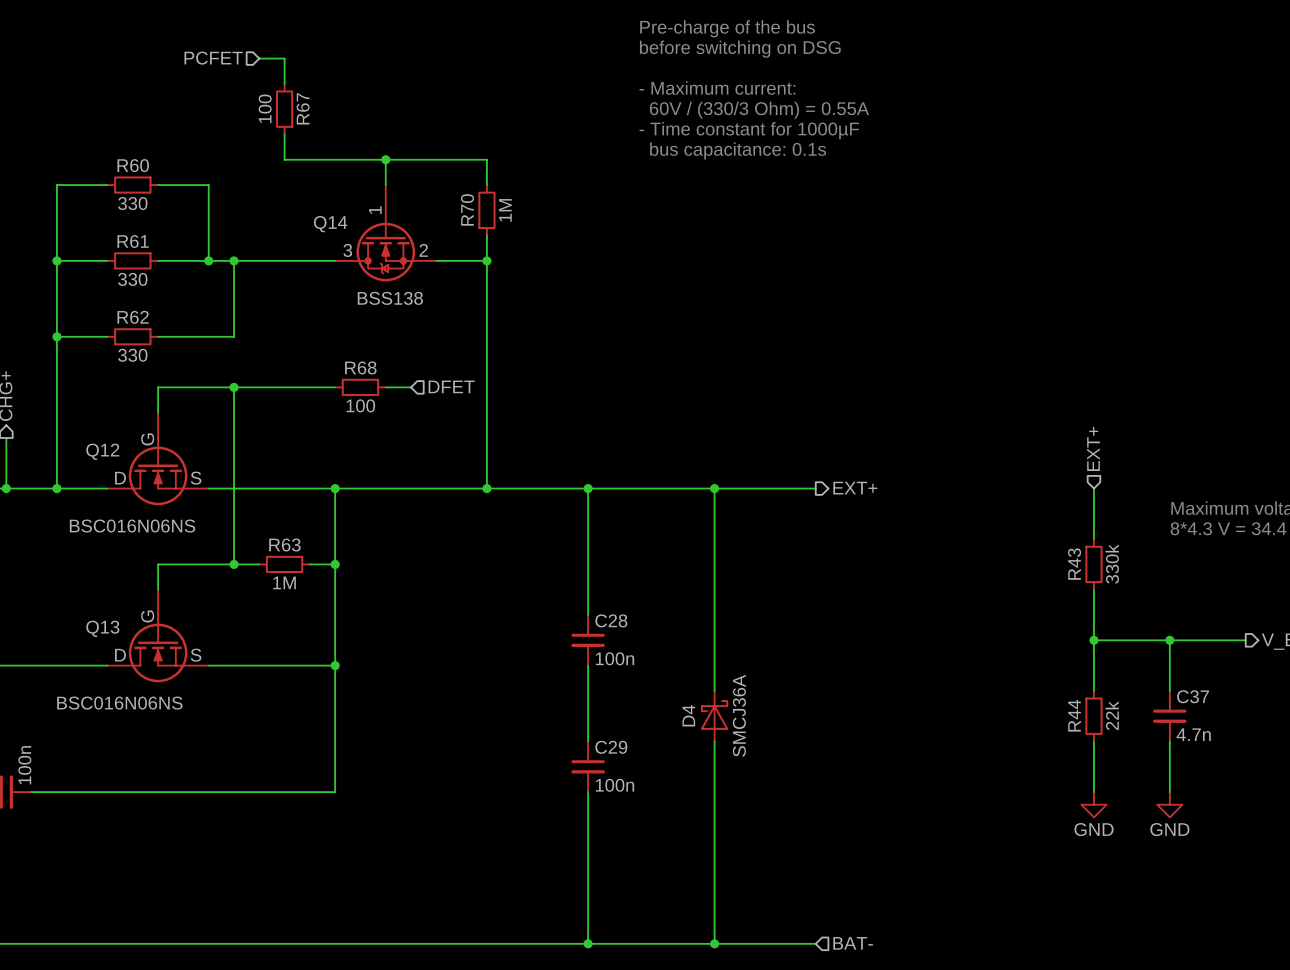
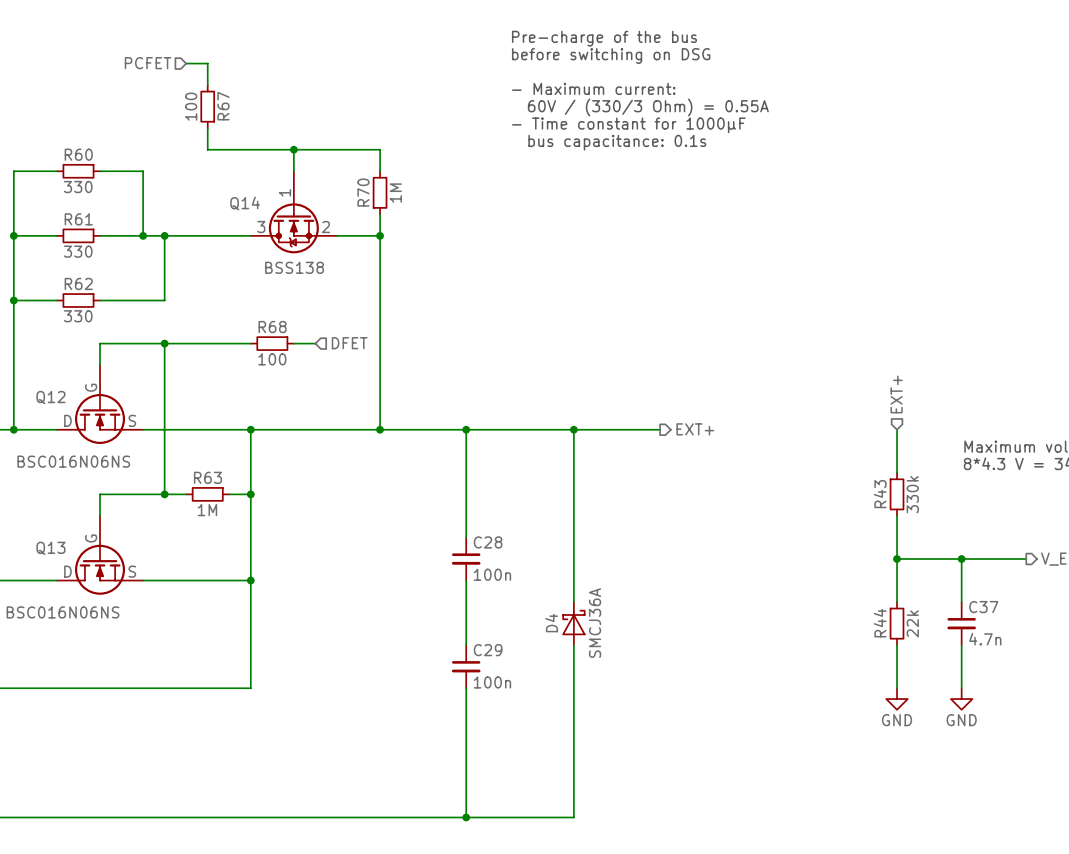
wire: (714, 943) (815, 943) -> none
junction: (714, 943) -> none
hierarchical label: BAT- (853, 943) -> none

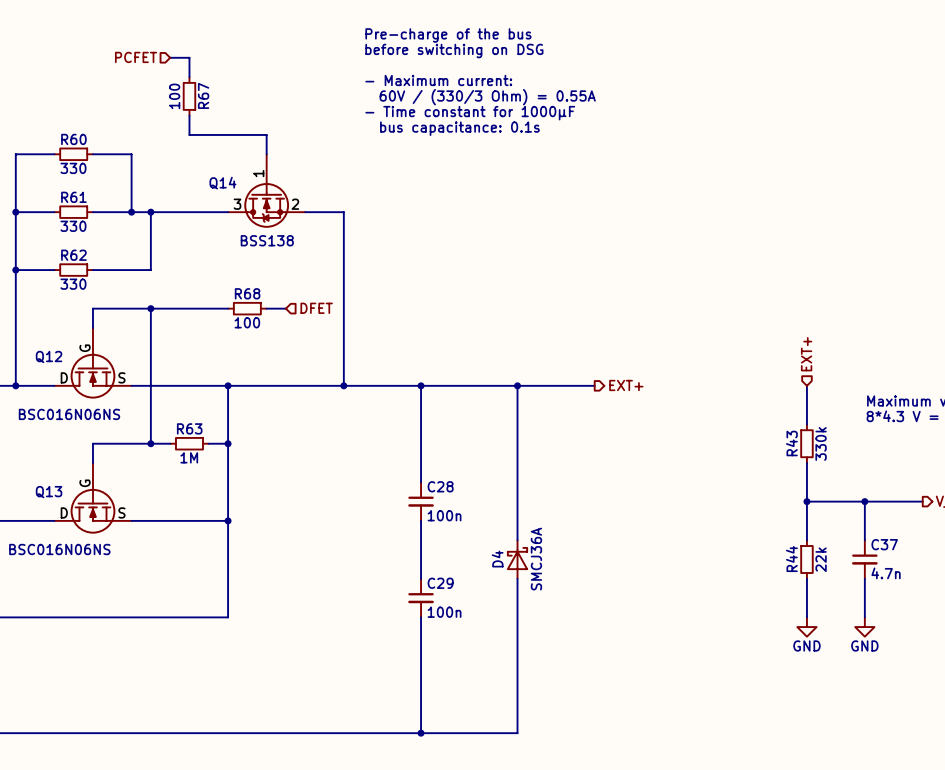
text position: Pre-charge of the bus (604, 38) -> Pre-charge of the bus (448, 35)
text position: before switching on DSG (611, 56) -> before switching on DSG (454, 51)
text position: - Maximum current: (593, 88) -> - Maximum current: (438, 80)
text position: 60V / (330/3 Ohm) = 0.55A (648, 107) -> 60V / (330/3 Ohm) = 0.55A (487, 97)
text position: - Time constant for 1000µF (628, 125) -> - Time constant for 1000µF (470, 113)
text position: bus capacitance: 0.1s (617, 142) -> bus capacitance: 0.1s (459, 128)
wire: (293, 149) (380, 149) (380, 171) -> none
junction: (293, 149) -> none
R70: 1M (380, 192) -> none
wire: (380, 214) (380, 235) -> none
junction: (380, 235) -> none

